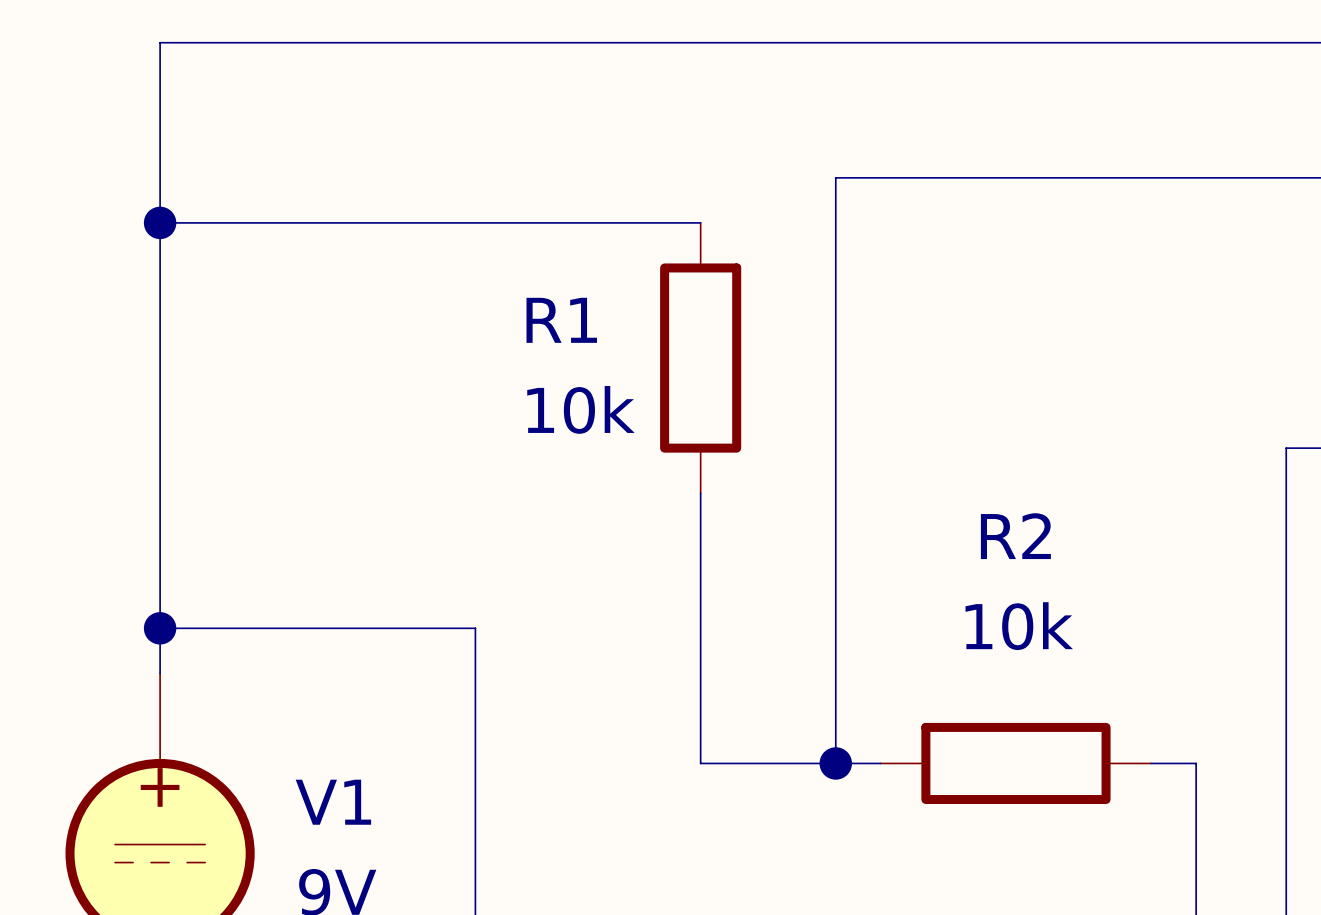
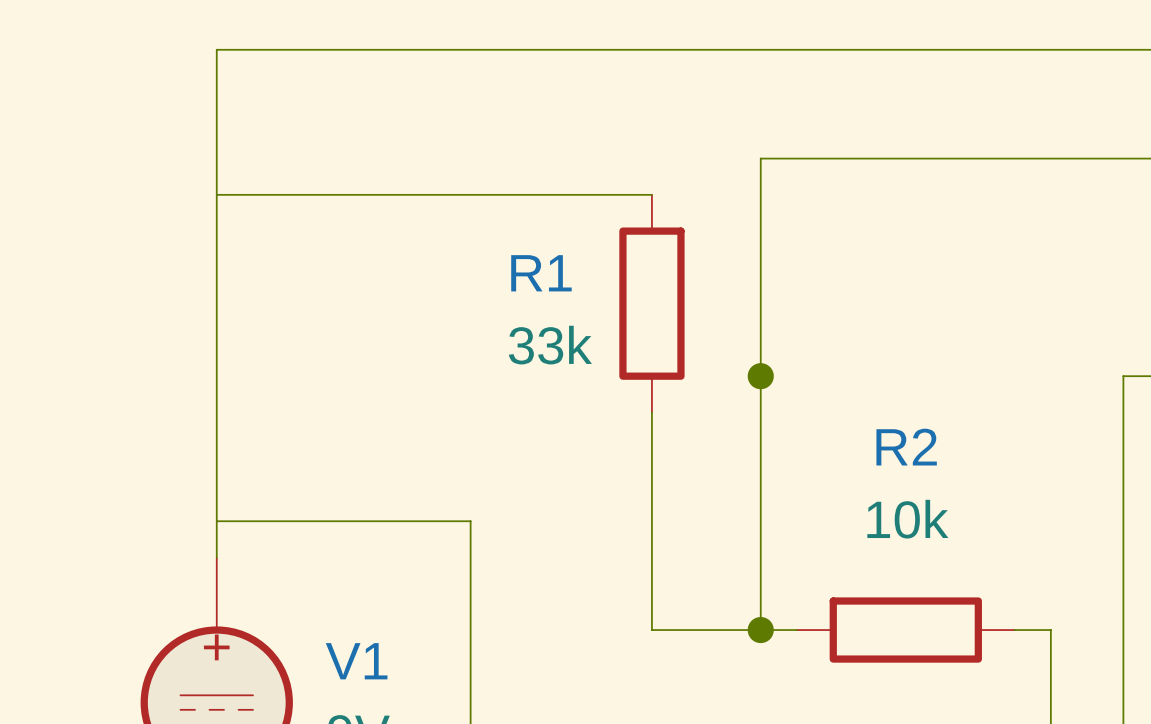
junction: (160, 222) -> none
R1 value: 10k (580, 409) -> 33k (550, 345)
junction: none -> (760, 376)
junction: (160, 628) -> none

